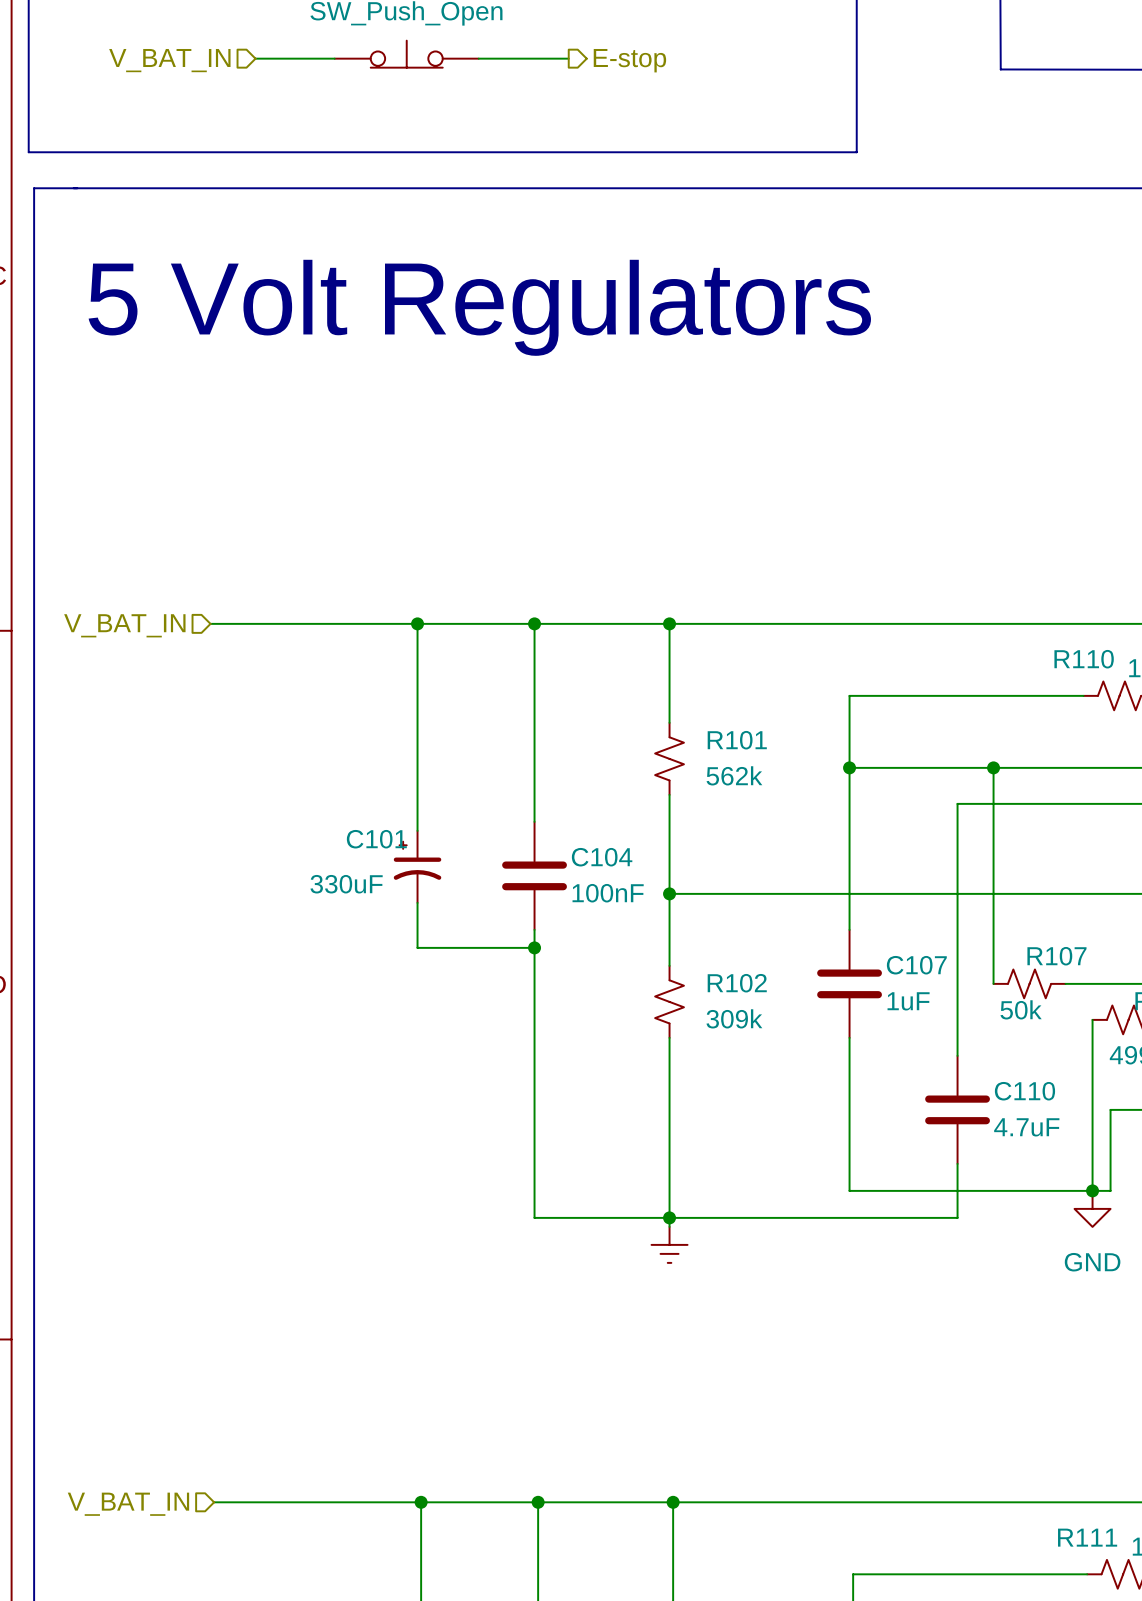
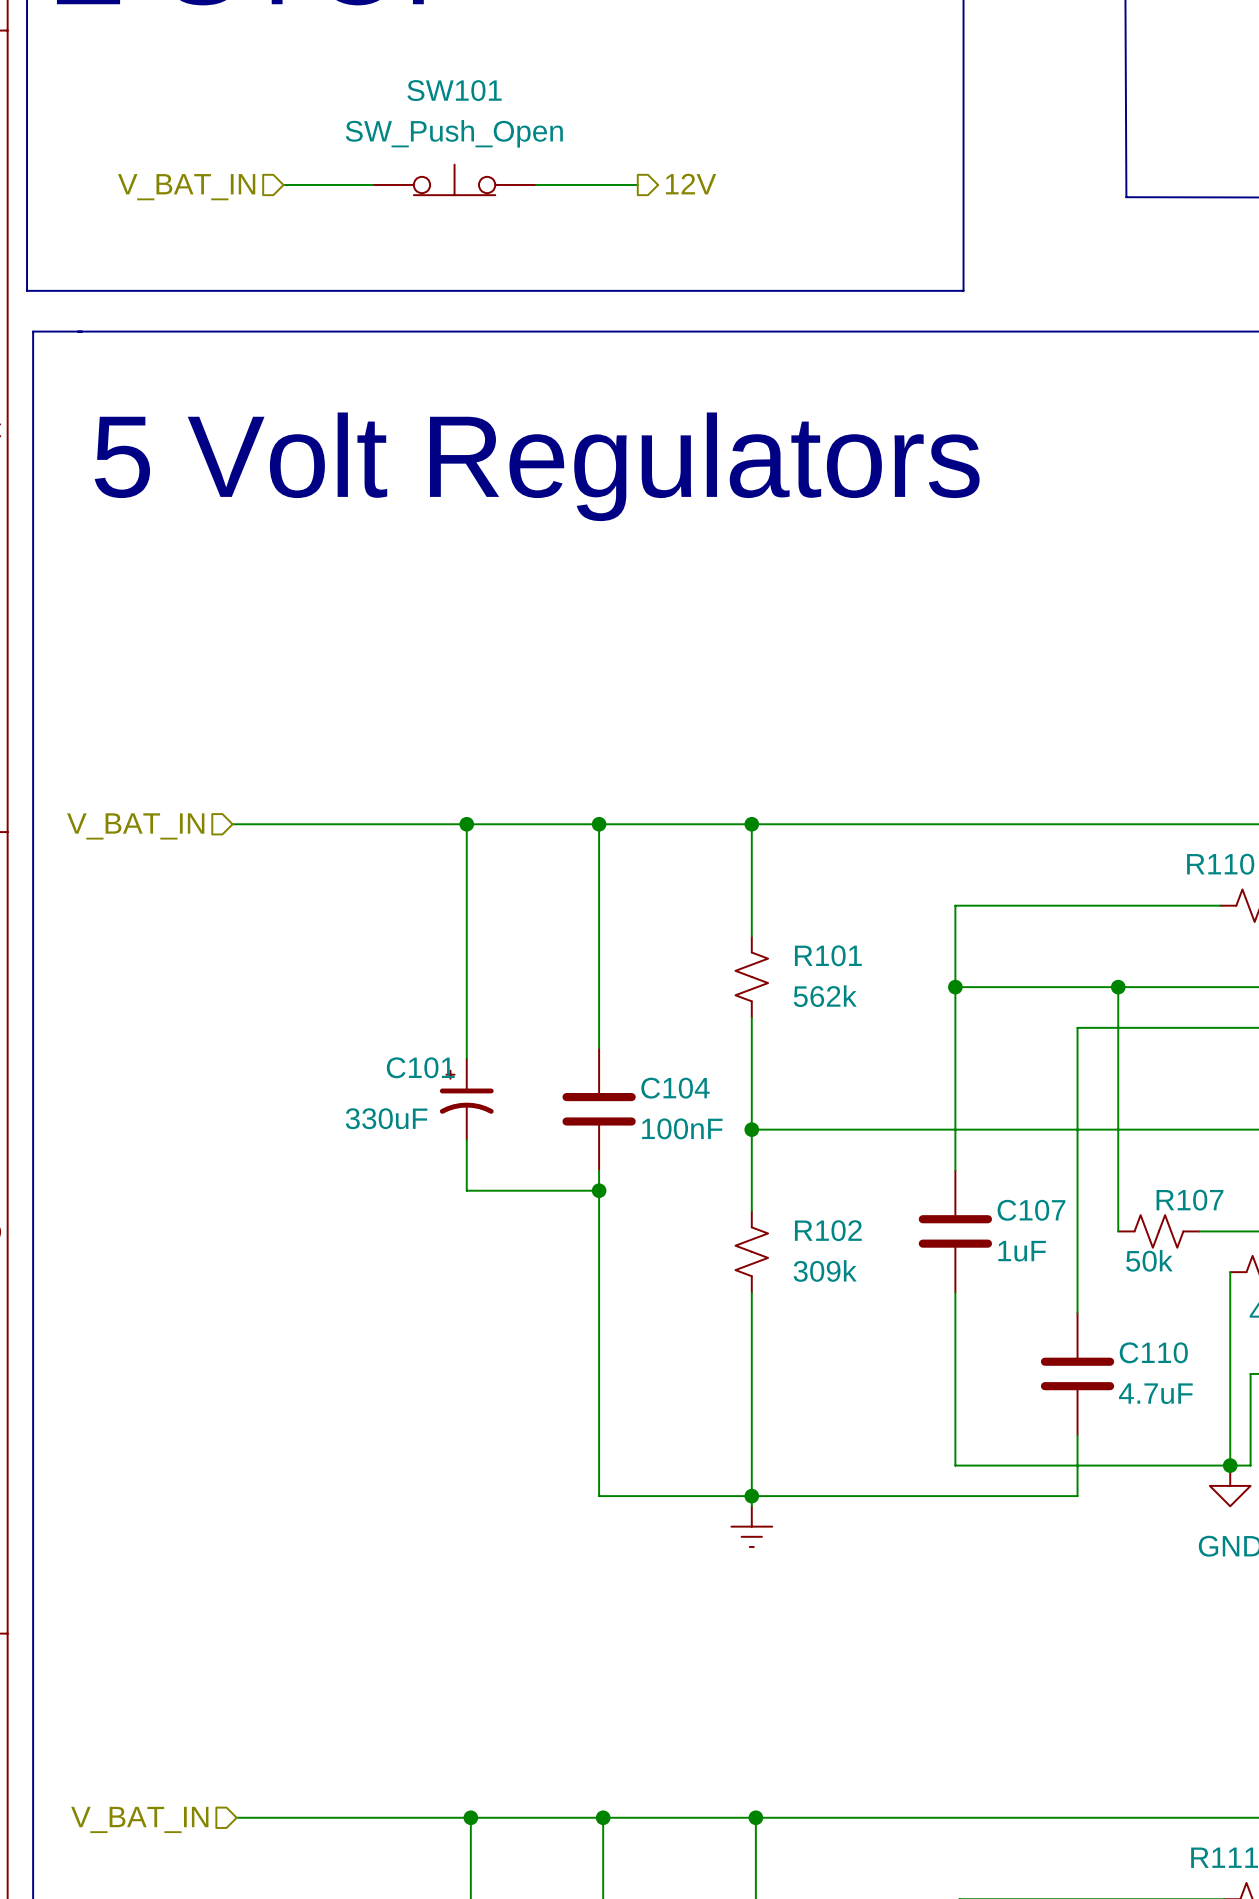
hierarchical label: E-stop (629, 60) -> 12V (691, 184)

